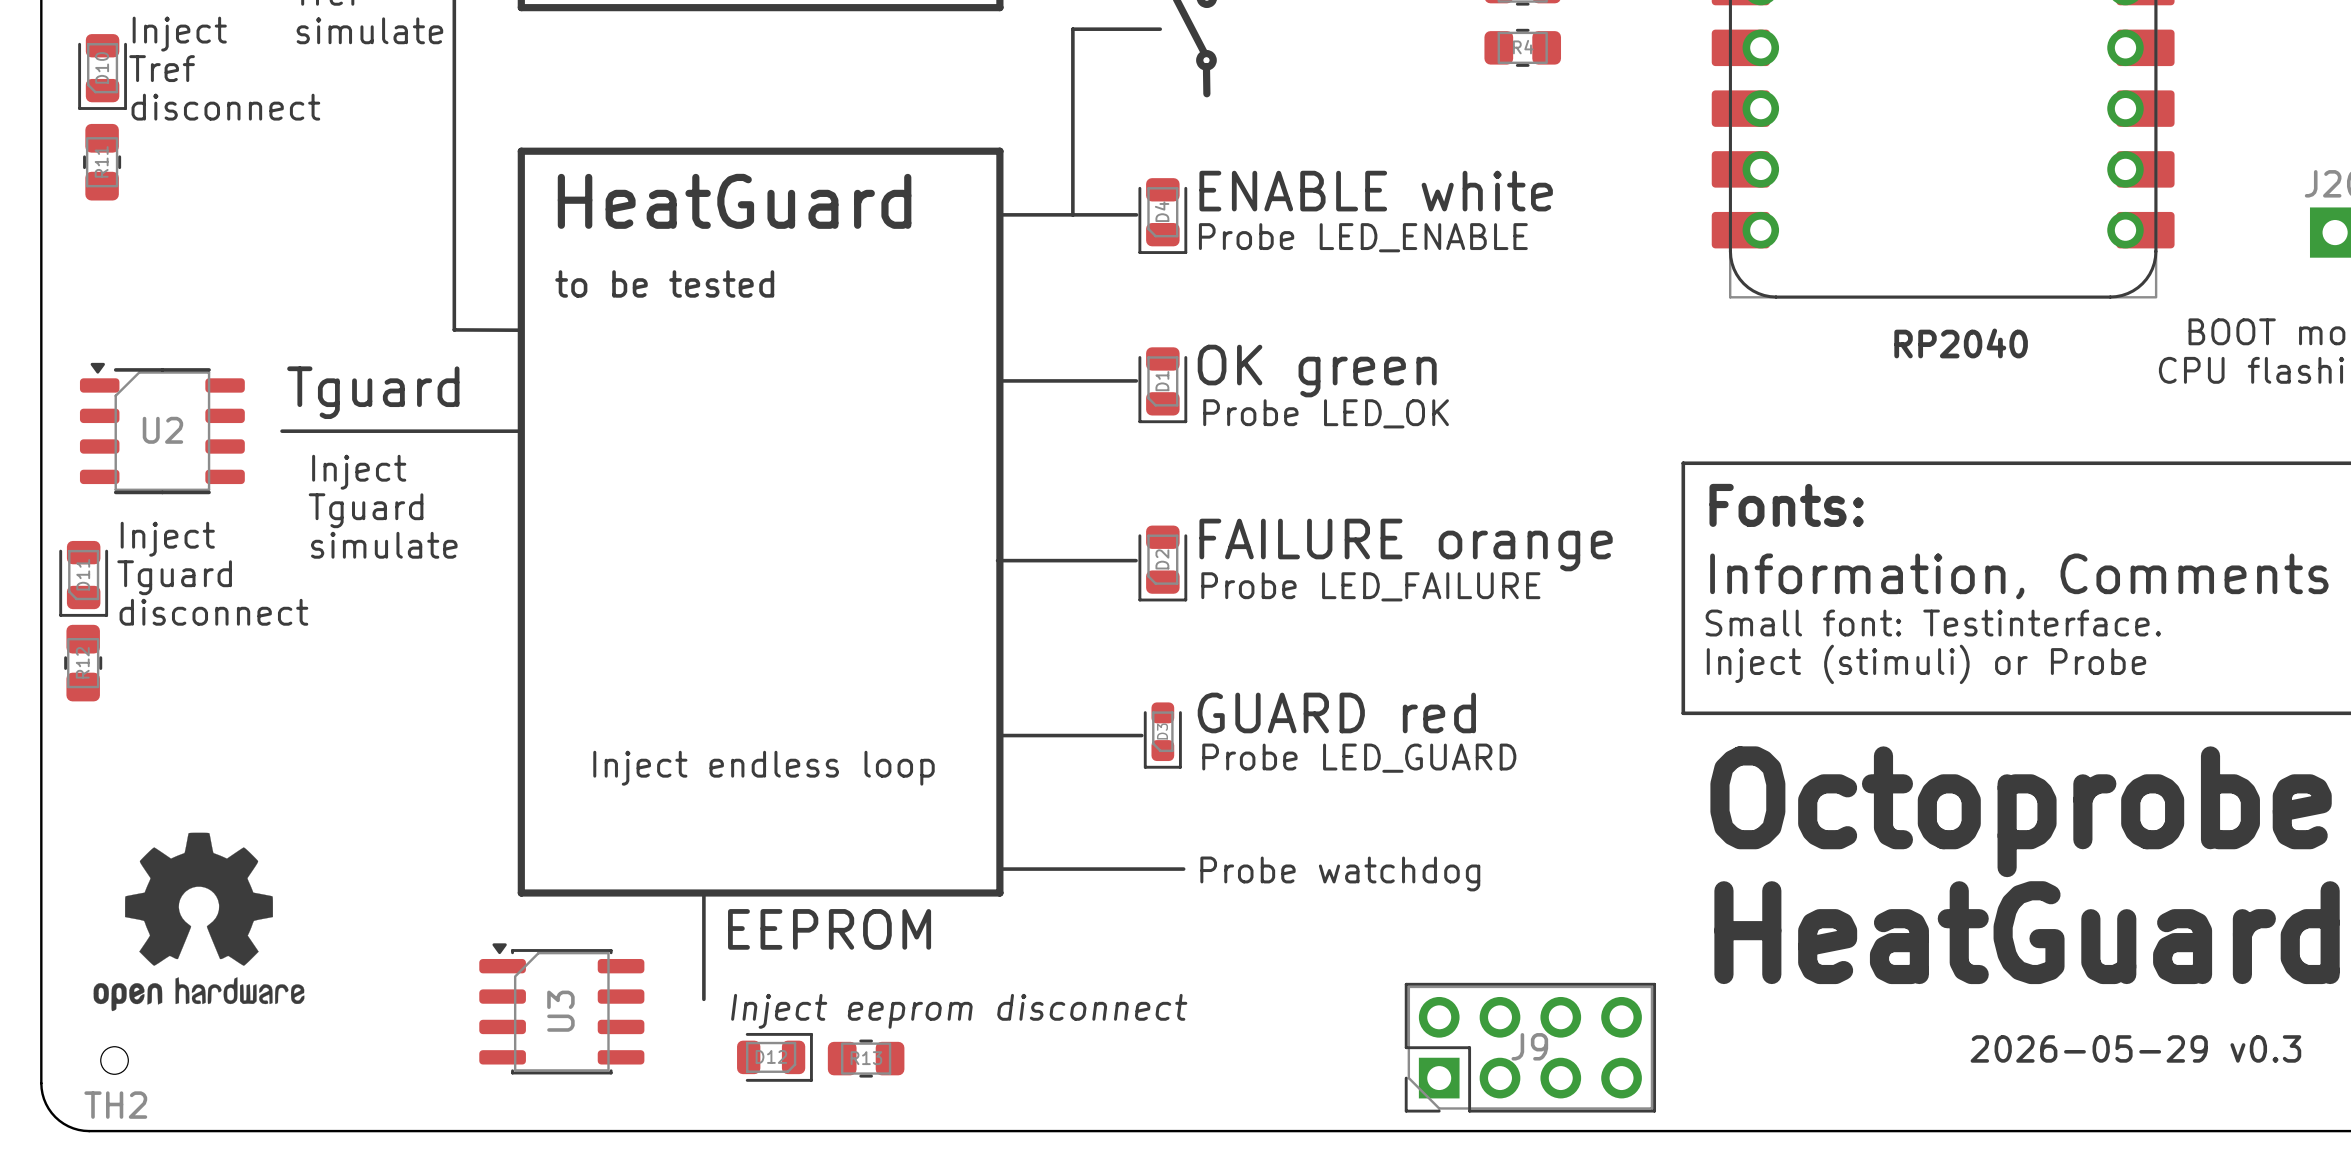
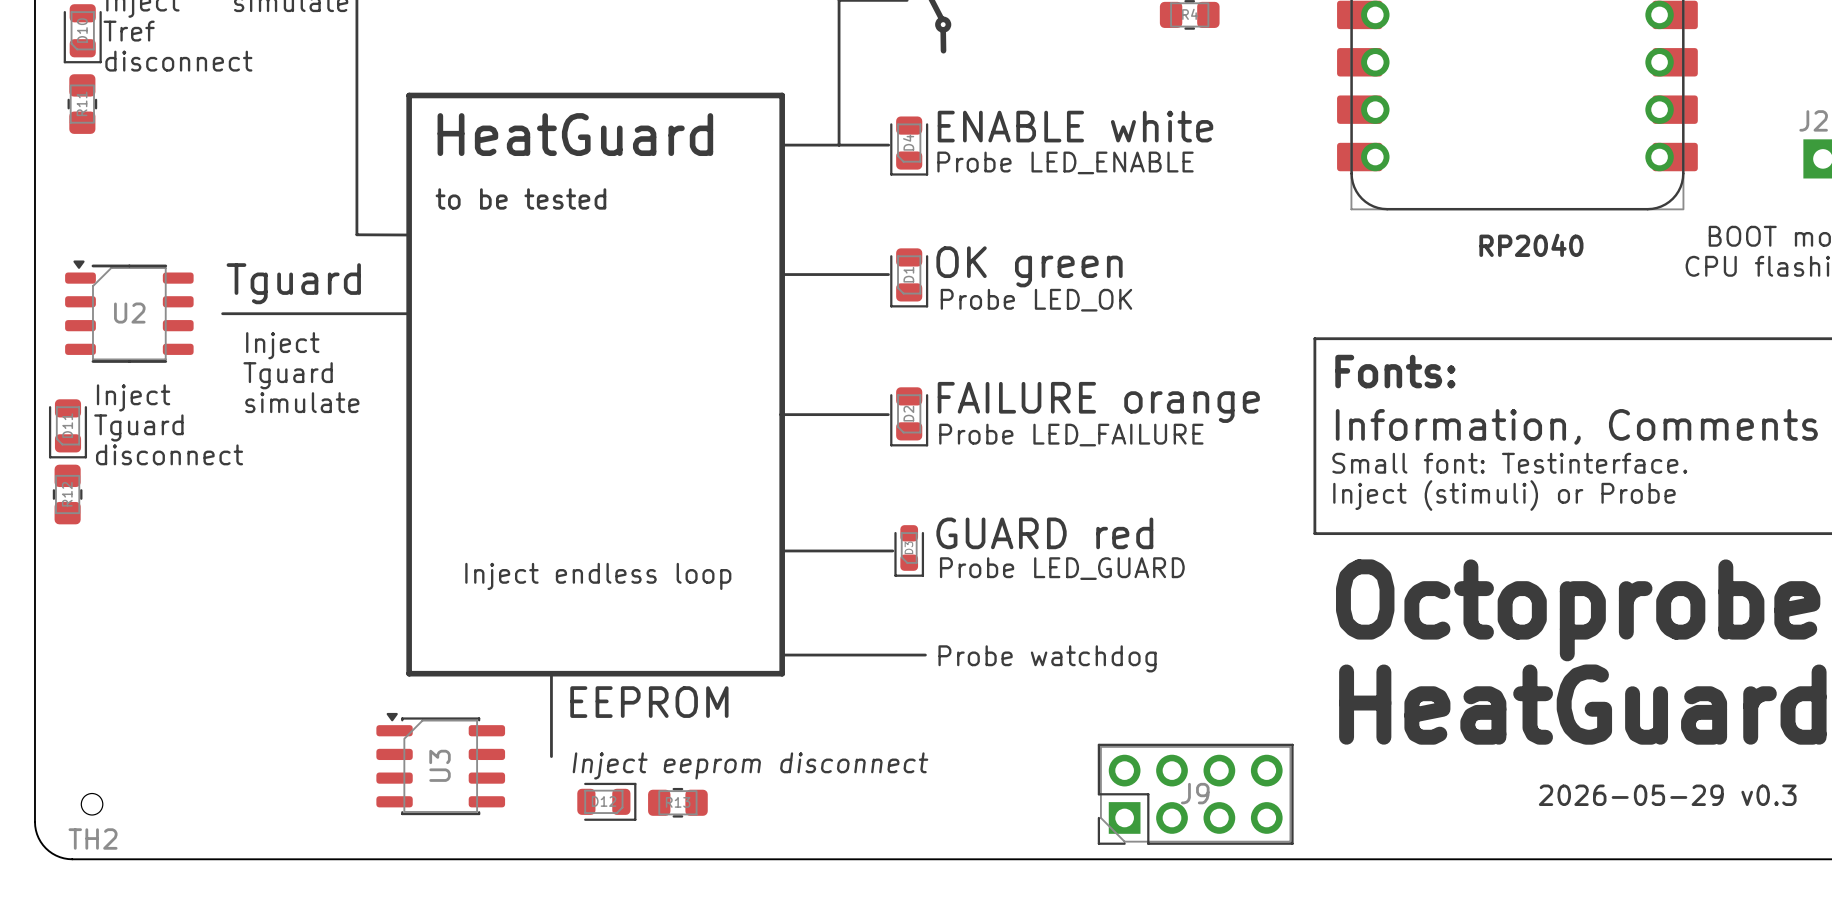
drawing: [93, 832, 305, 1012] -> none

